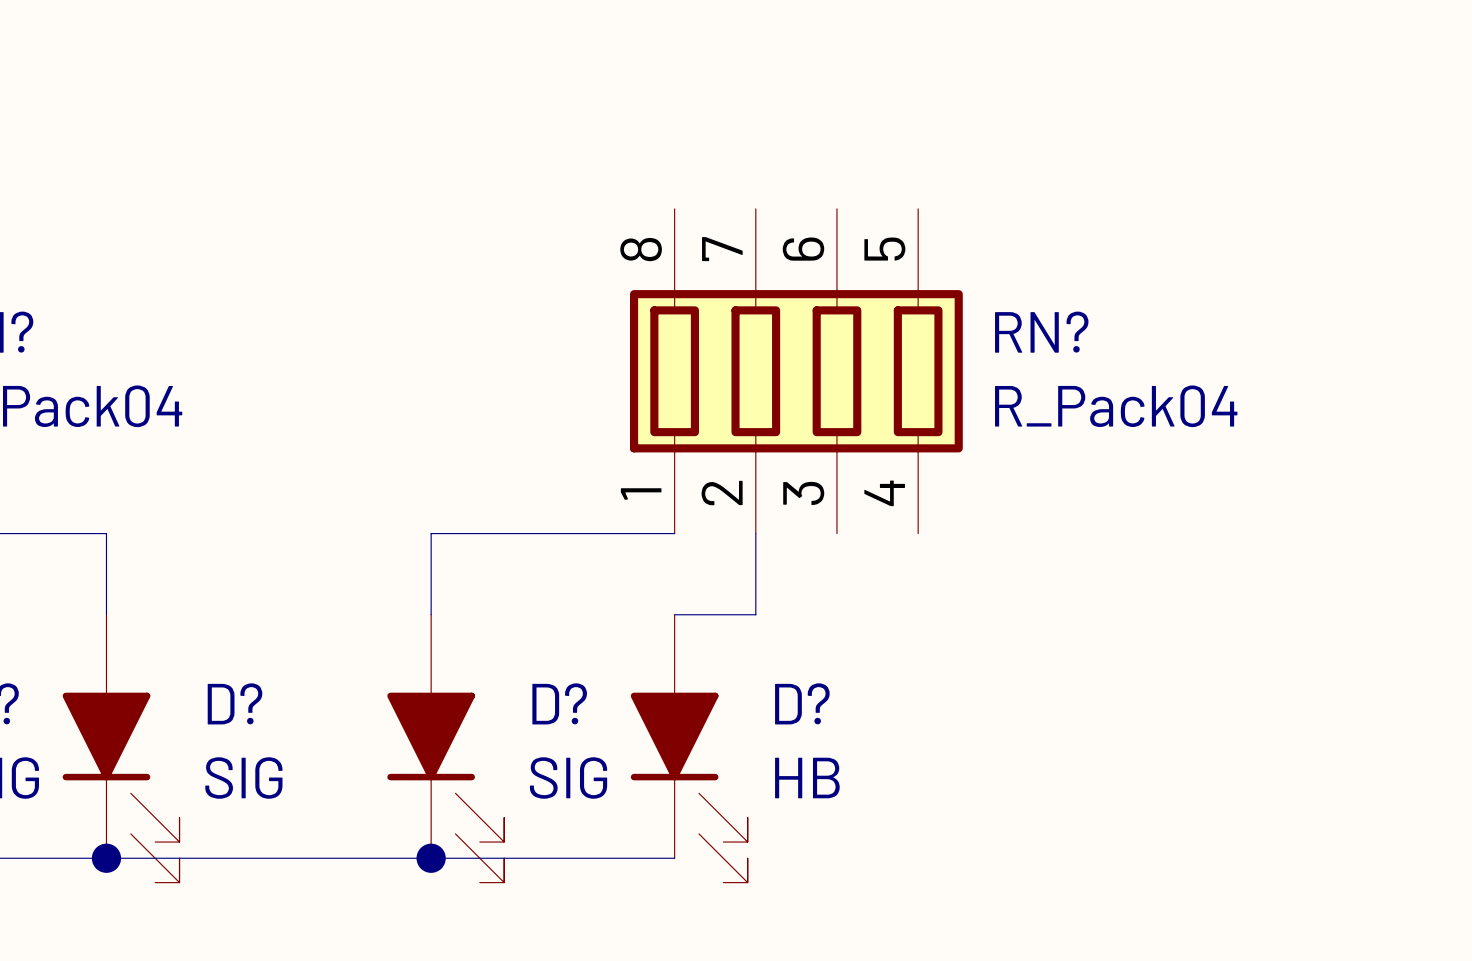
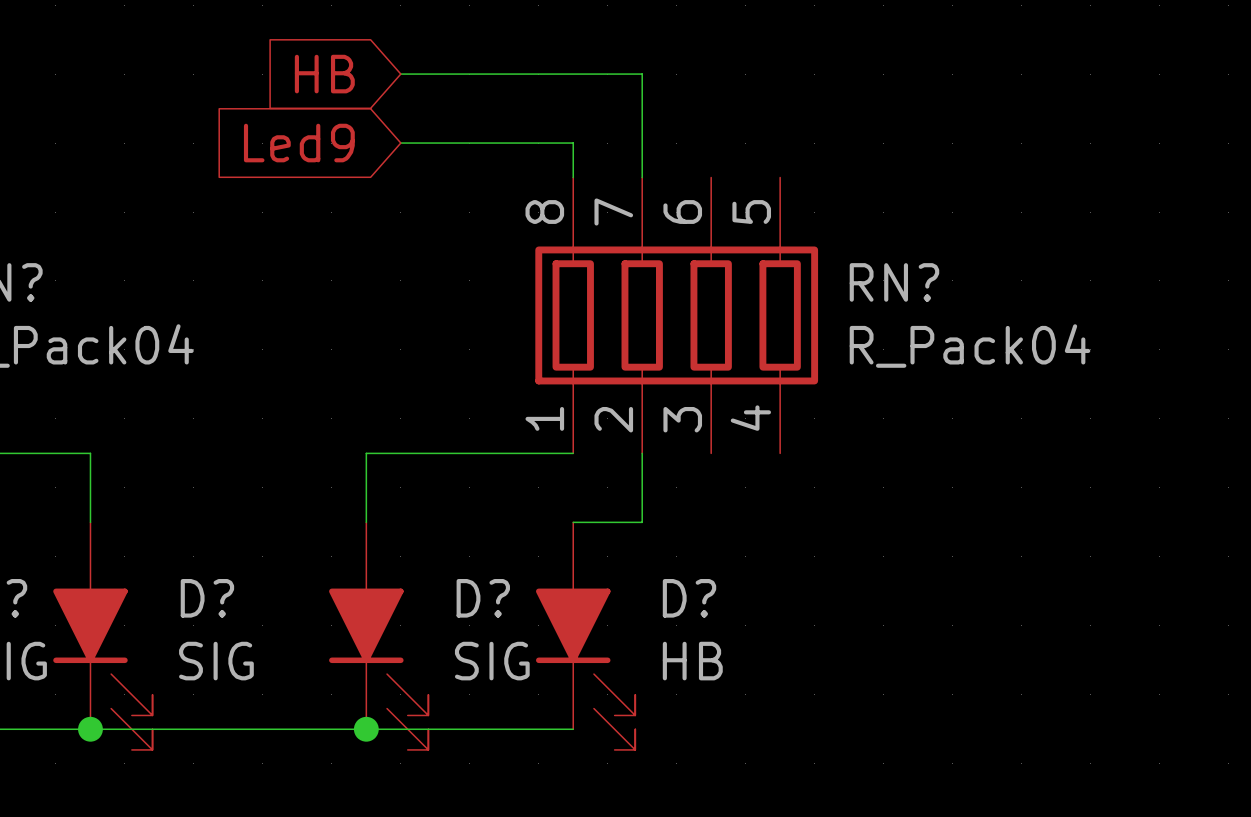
global label: none -> HB (324, 74)
wire: none -> (400, 74) (642, 74) (642, 177)
global label: none -> Led9 (299, 143)
wire: none -> (400, 143) (573, 143) (573, 177)

